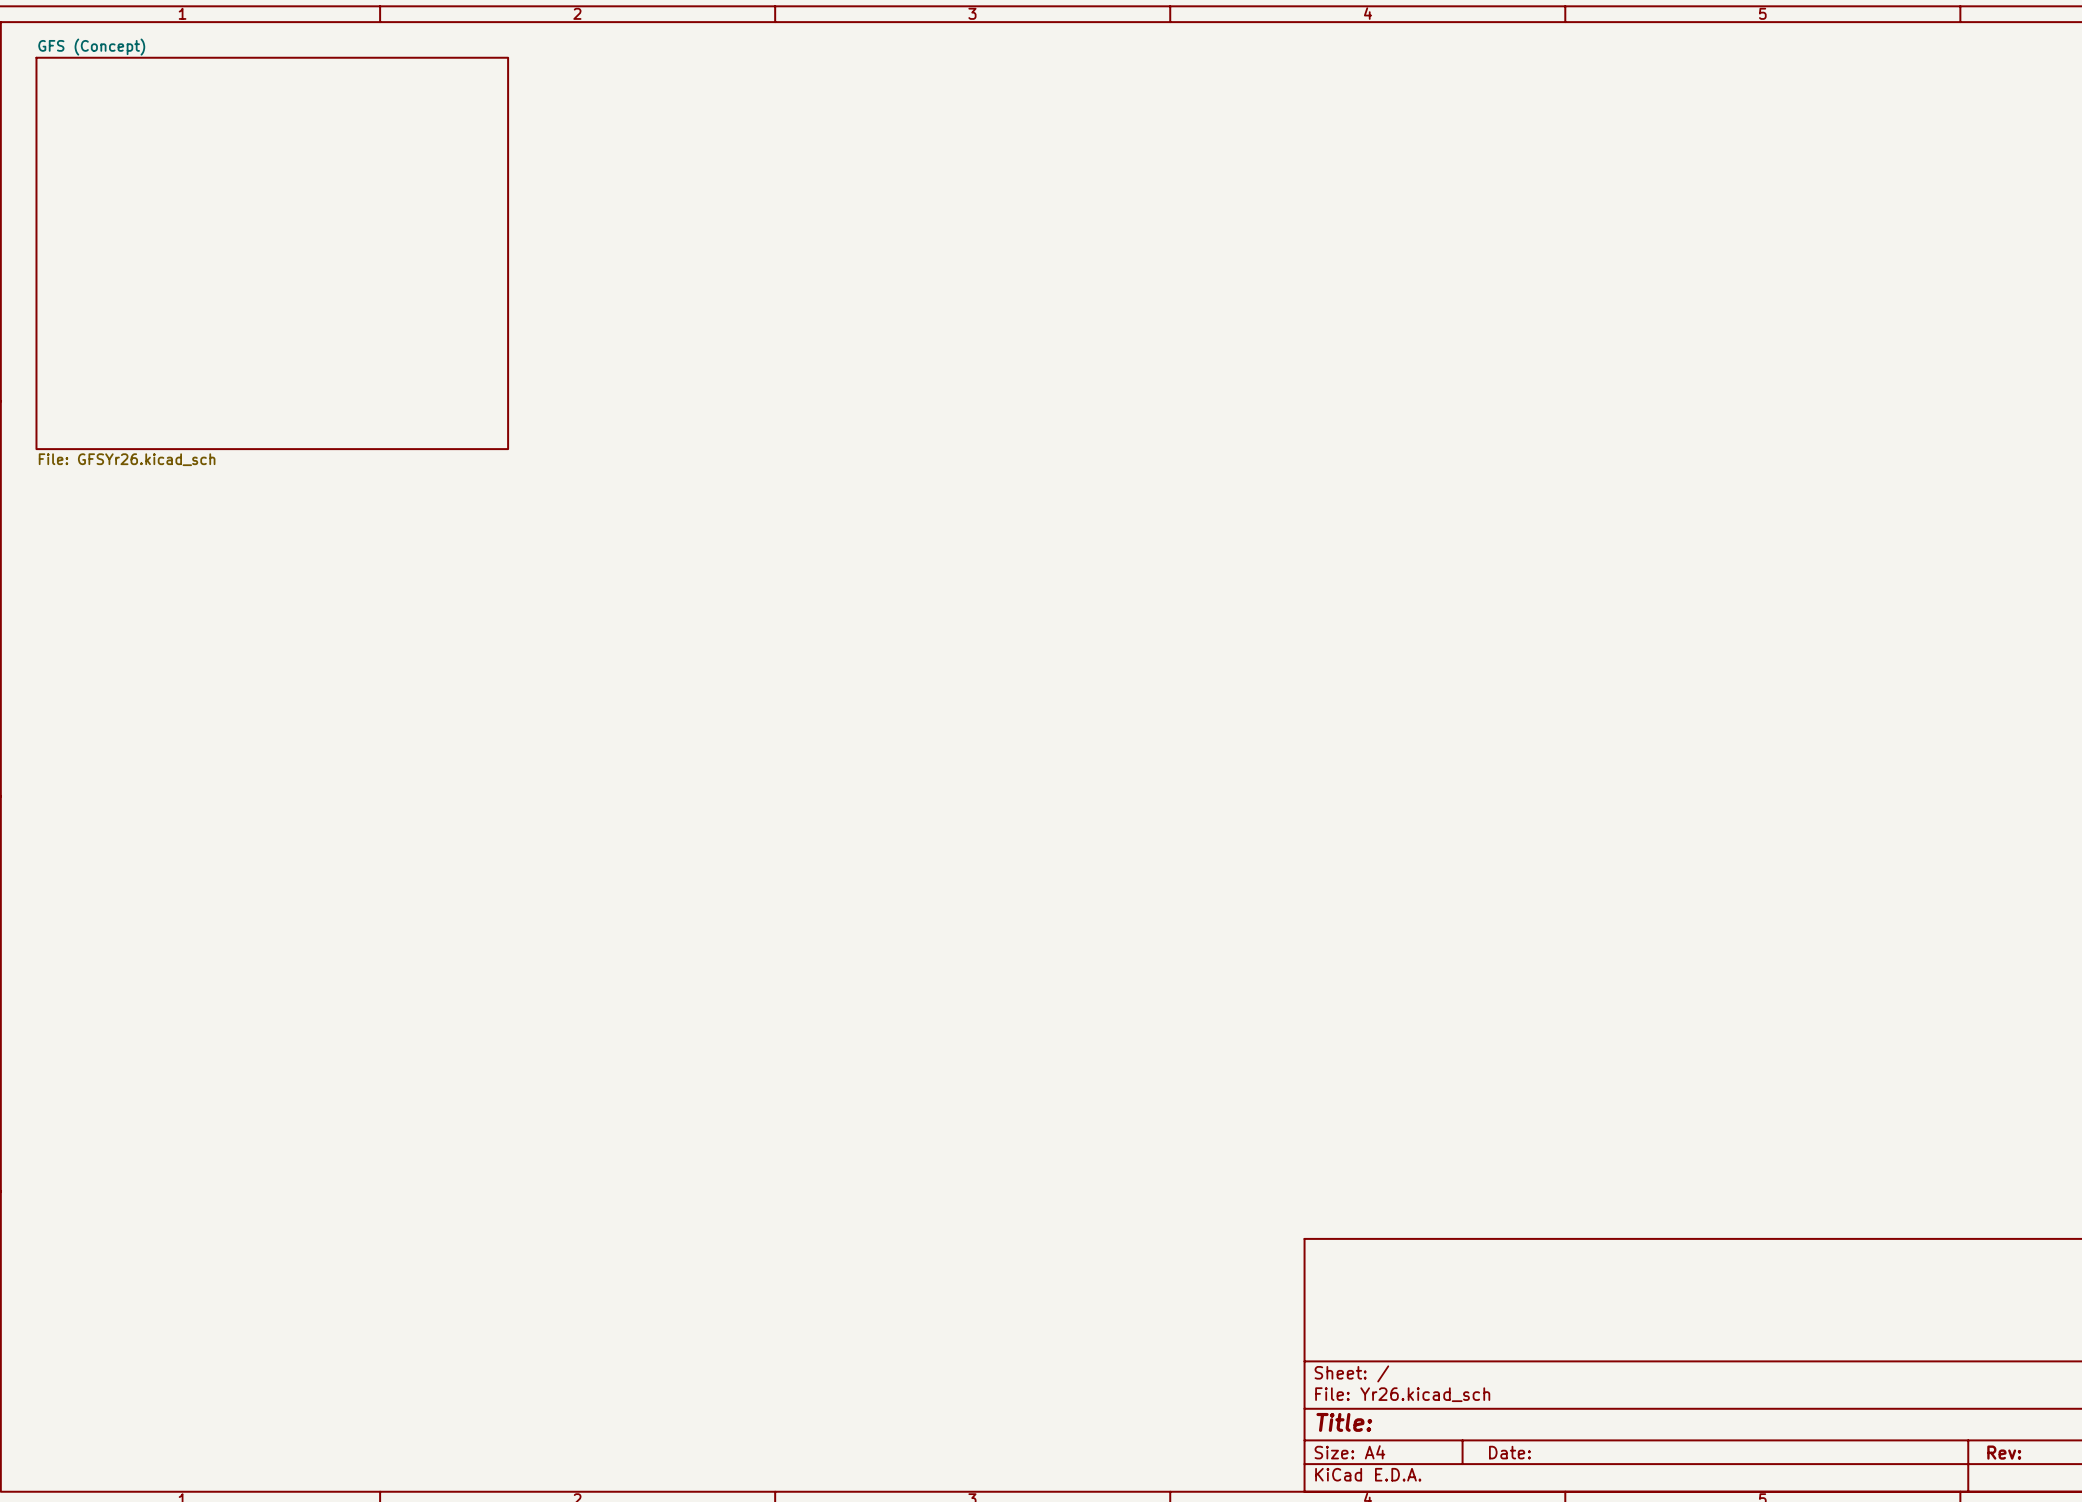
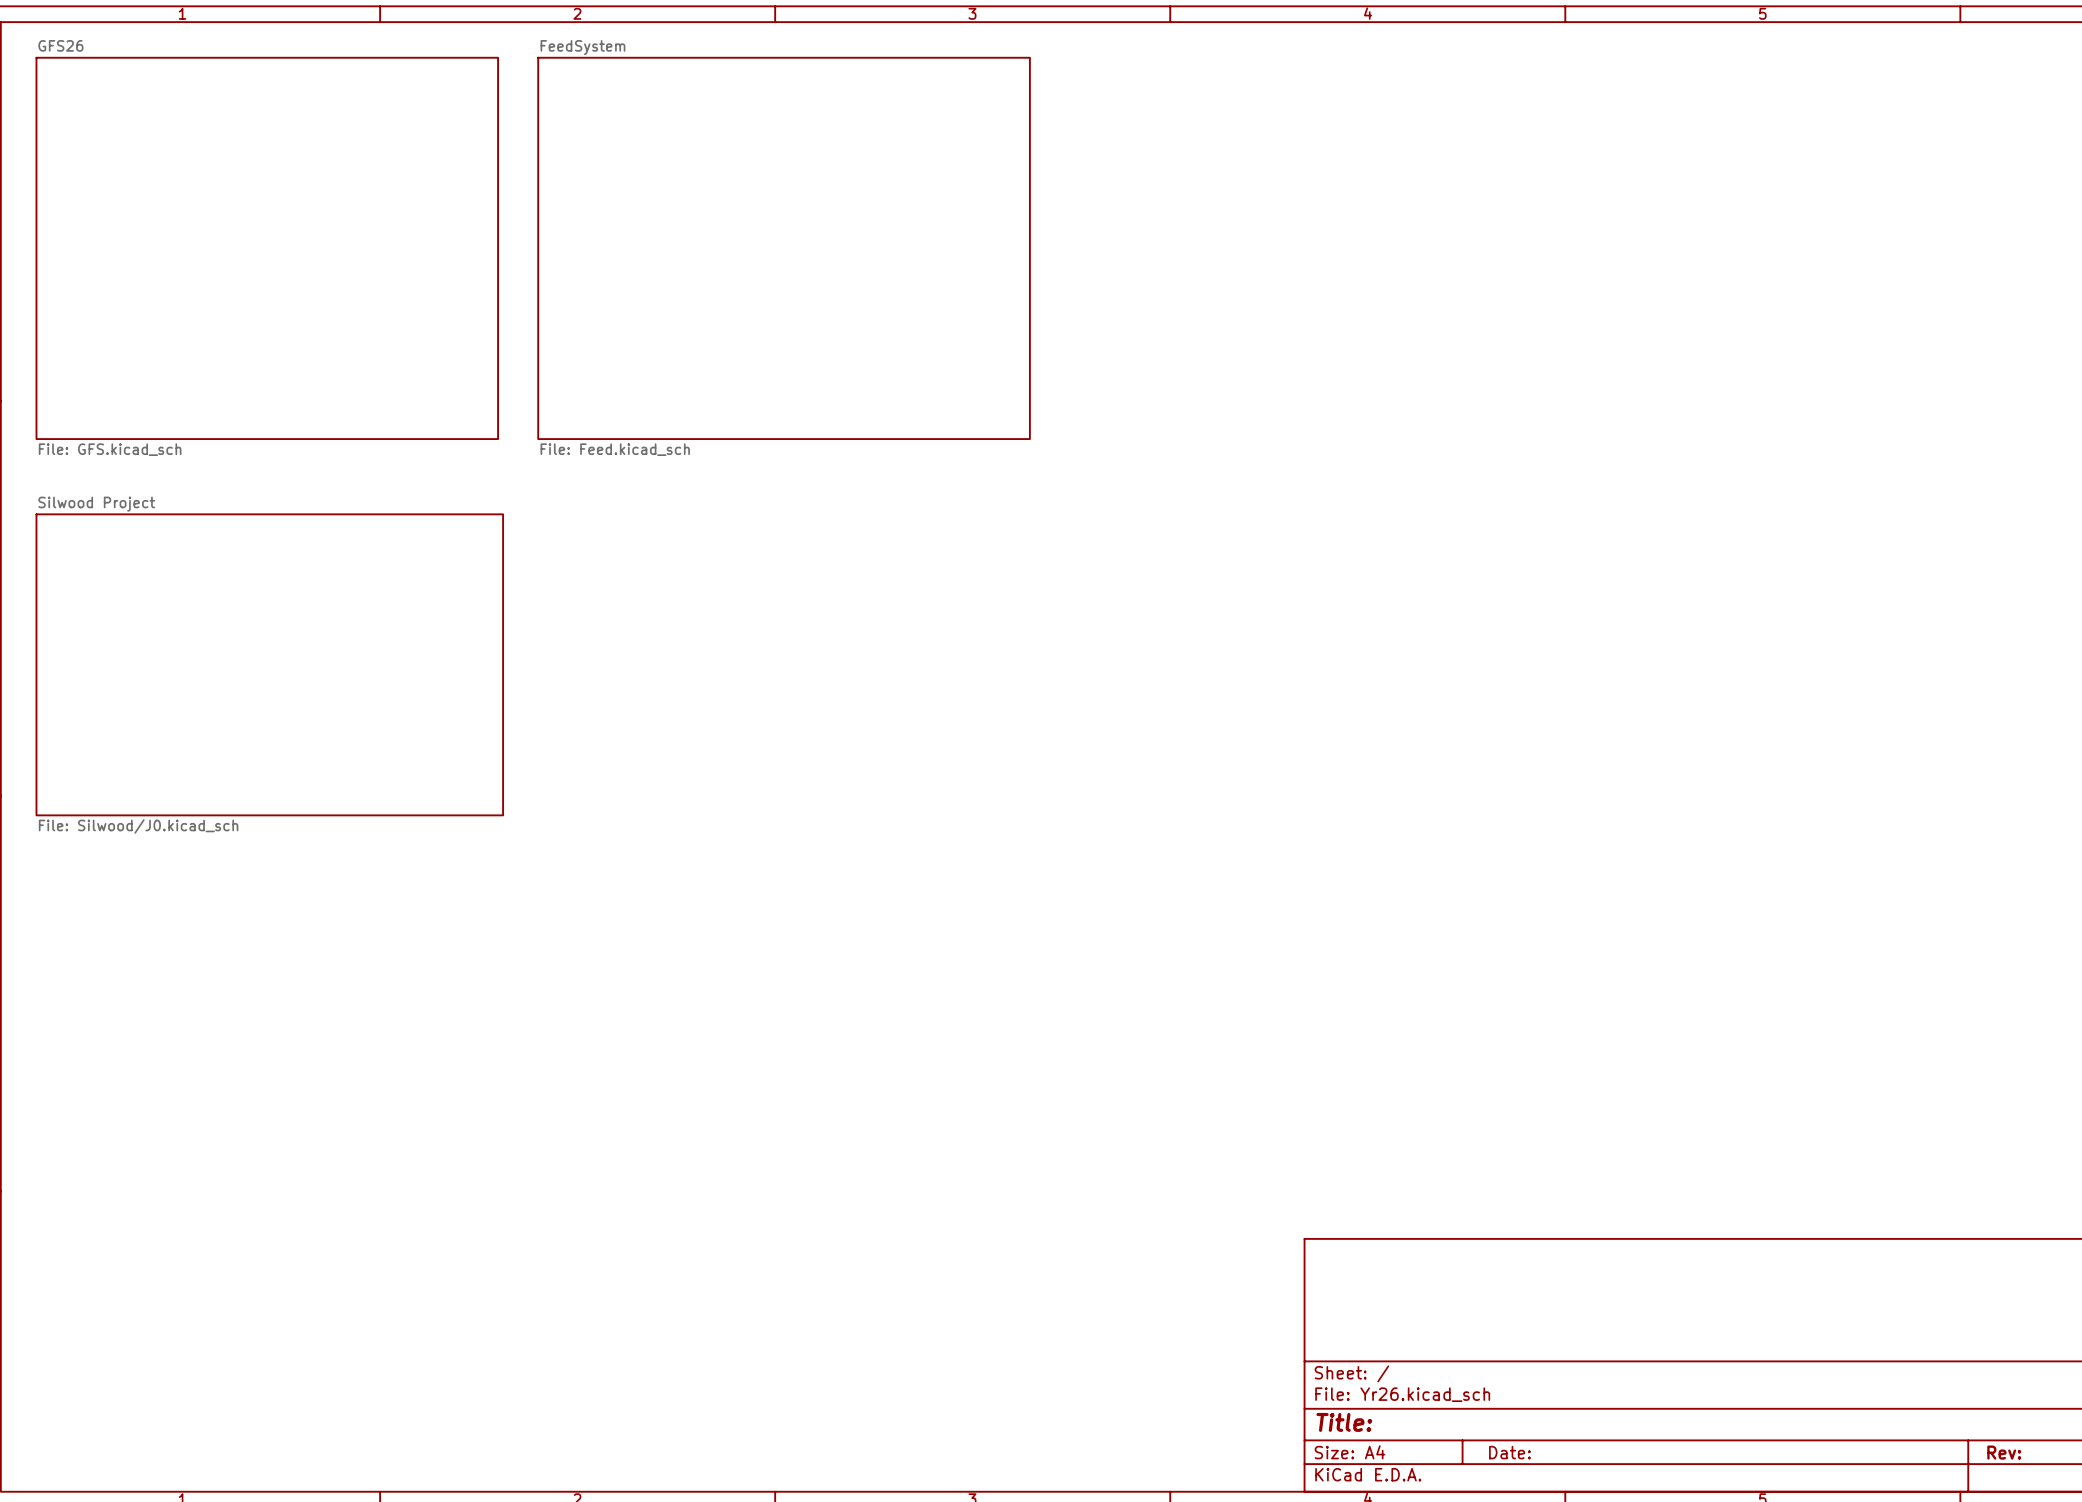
sheet GFS26: none -> File: GFS.kicad_sch (267, 248)
sheet FeedSystem: none -> File: Feed.kicad_sch (784, 248)
sheet GFS (Concept): File: GFSYr26.kicad_sch (272, 253) -> none
sheet Silwood Project: none -> File: Silwood/J0.kicad_sch (269, 664)

